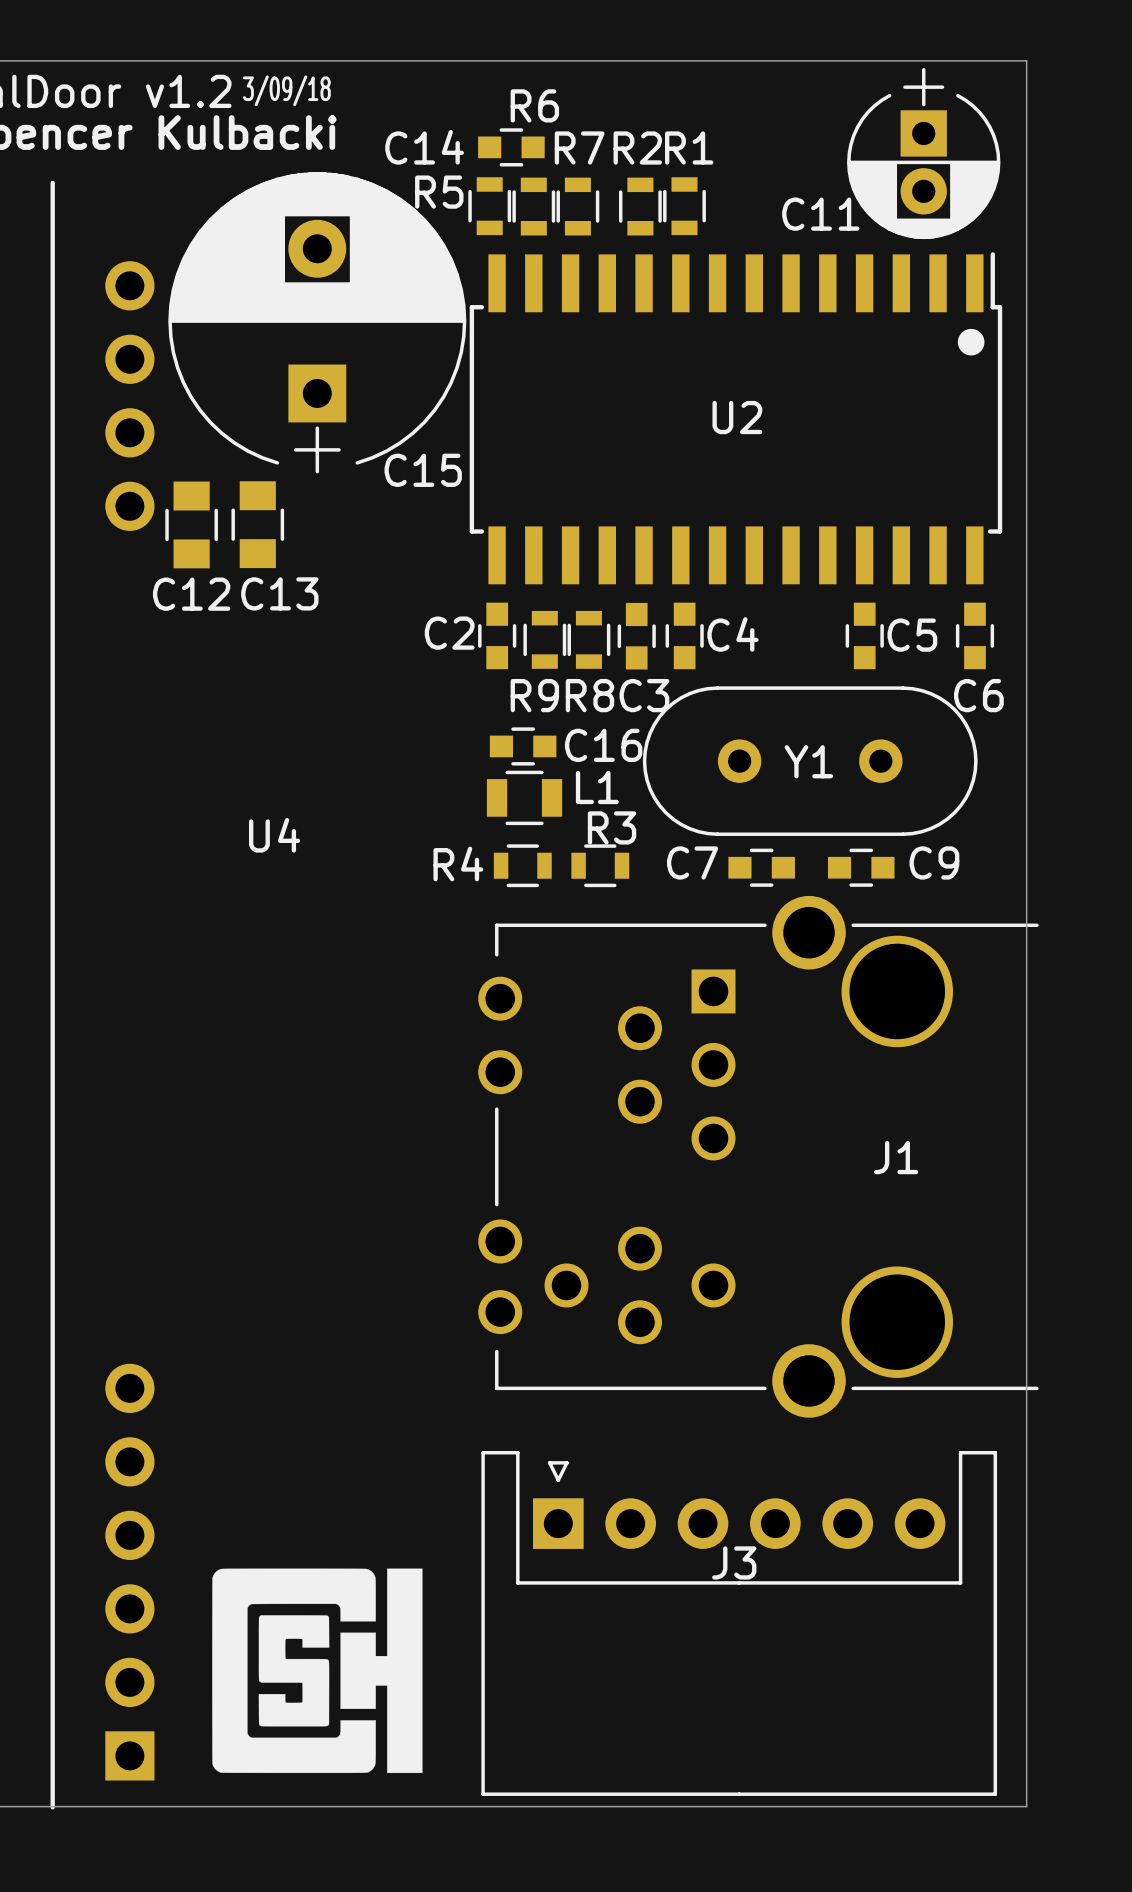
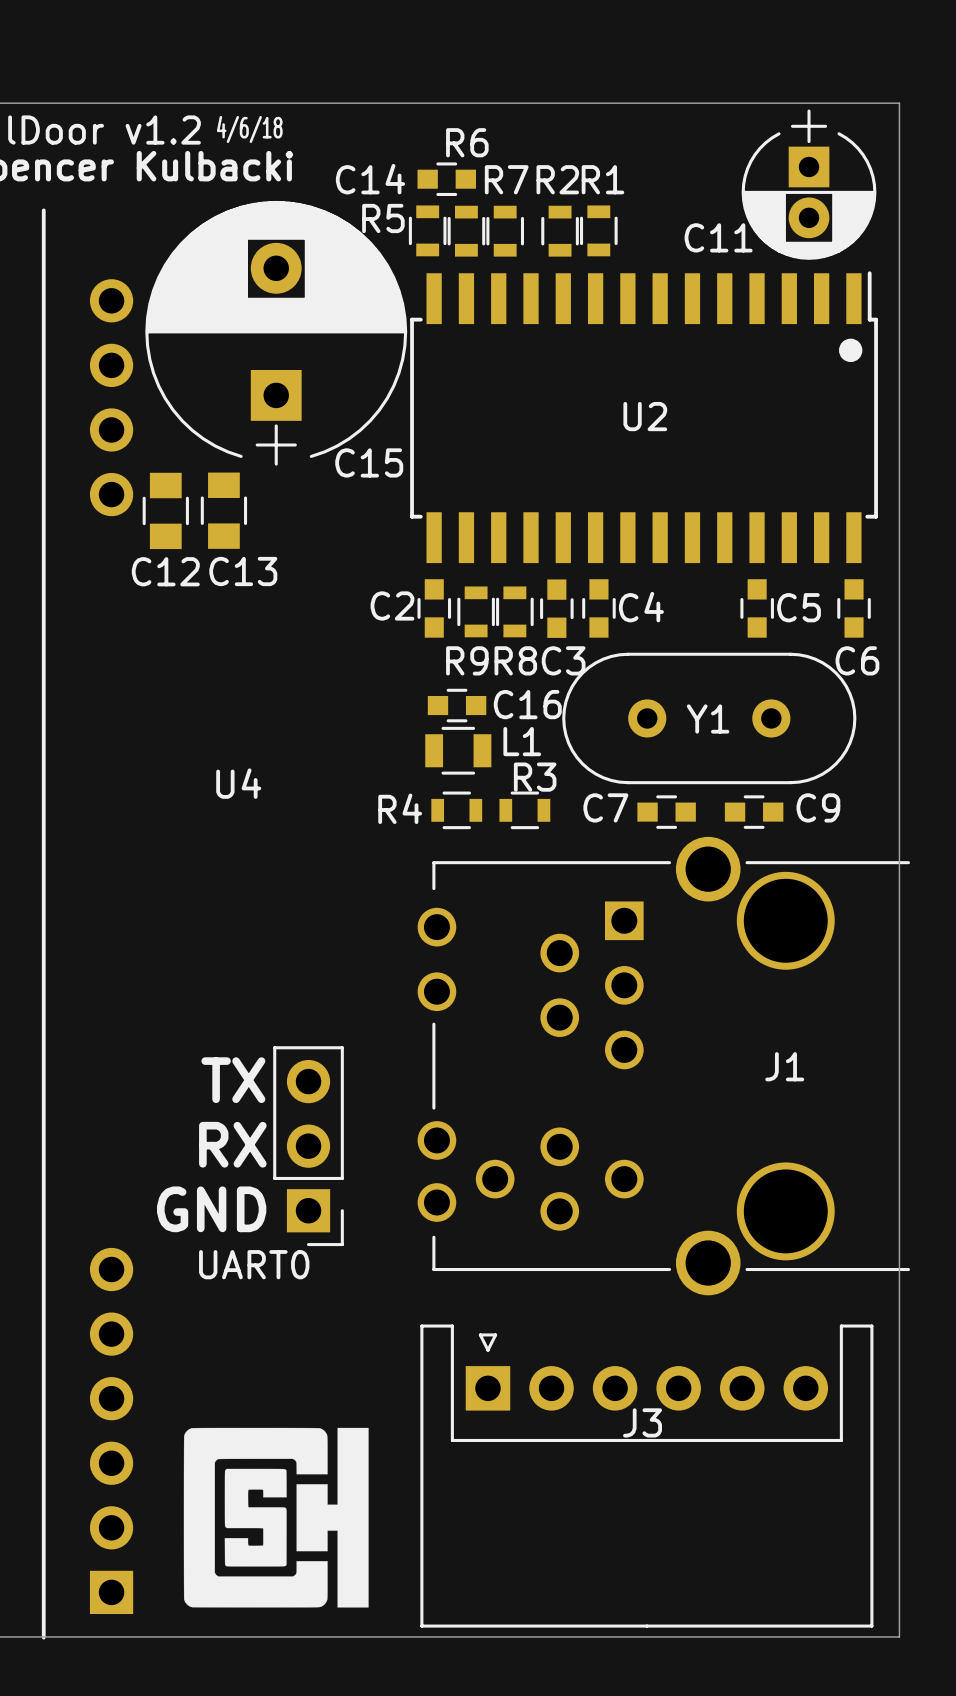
text: 3/09/18 (286, 90) -> 4/6/18 (249, 129)
text: none -> TX (233, 1080)
text: none -> RX (232, 1144)
UART0: none -> (308, 1146)
text: none -> GND (211, 1209)

